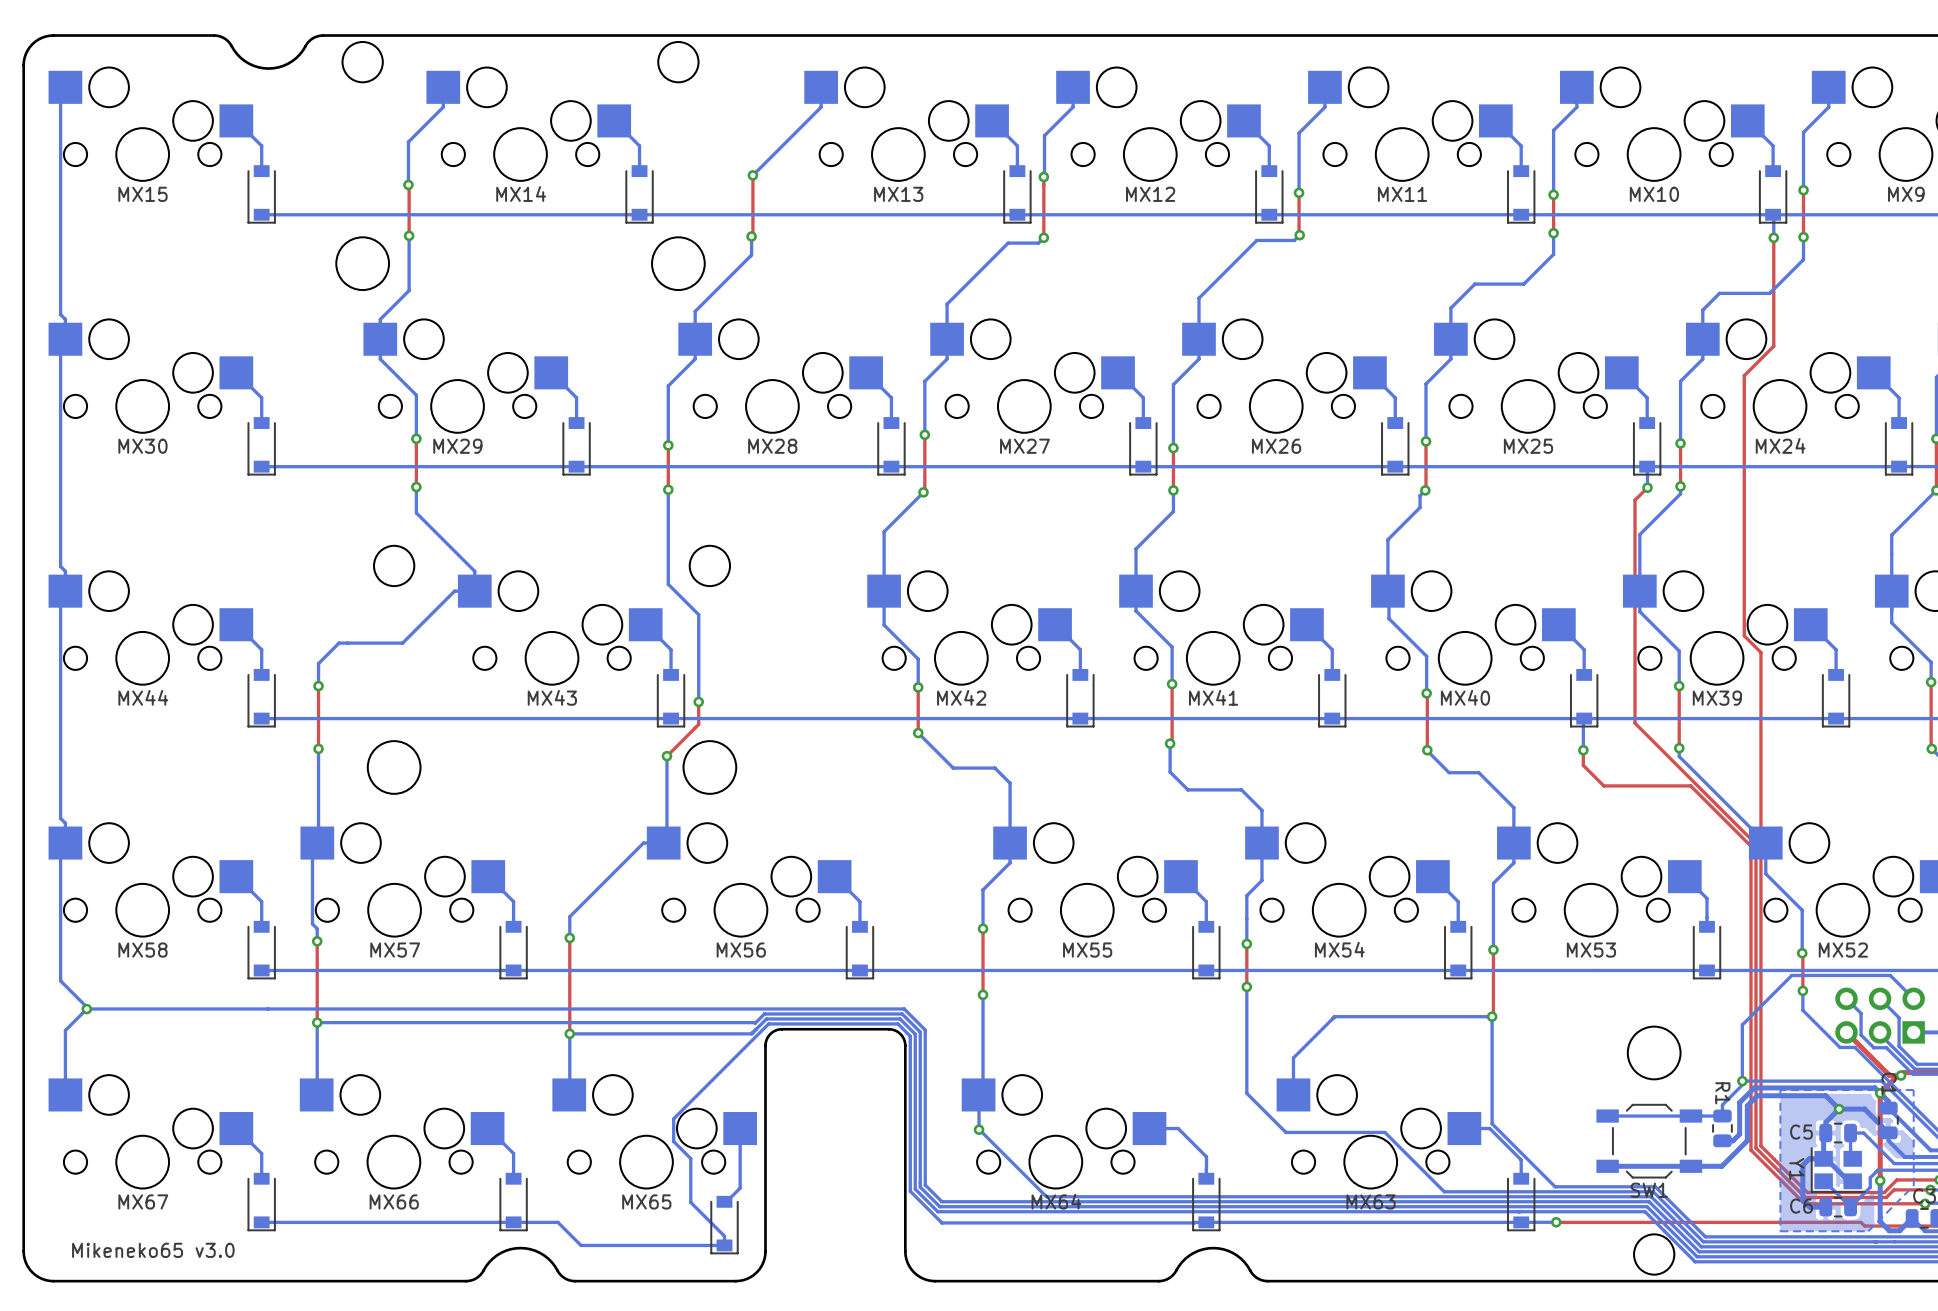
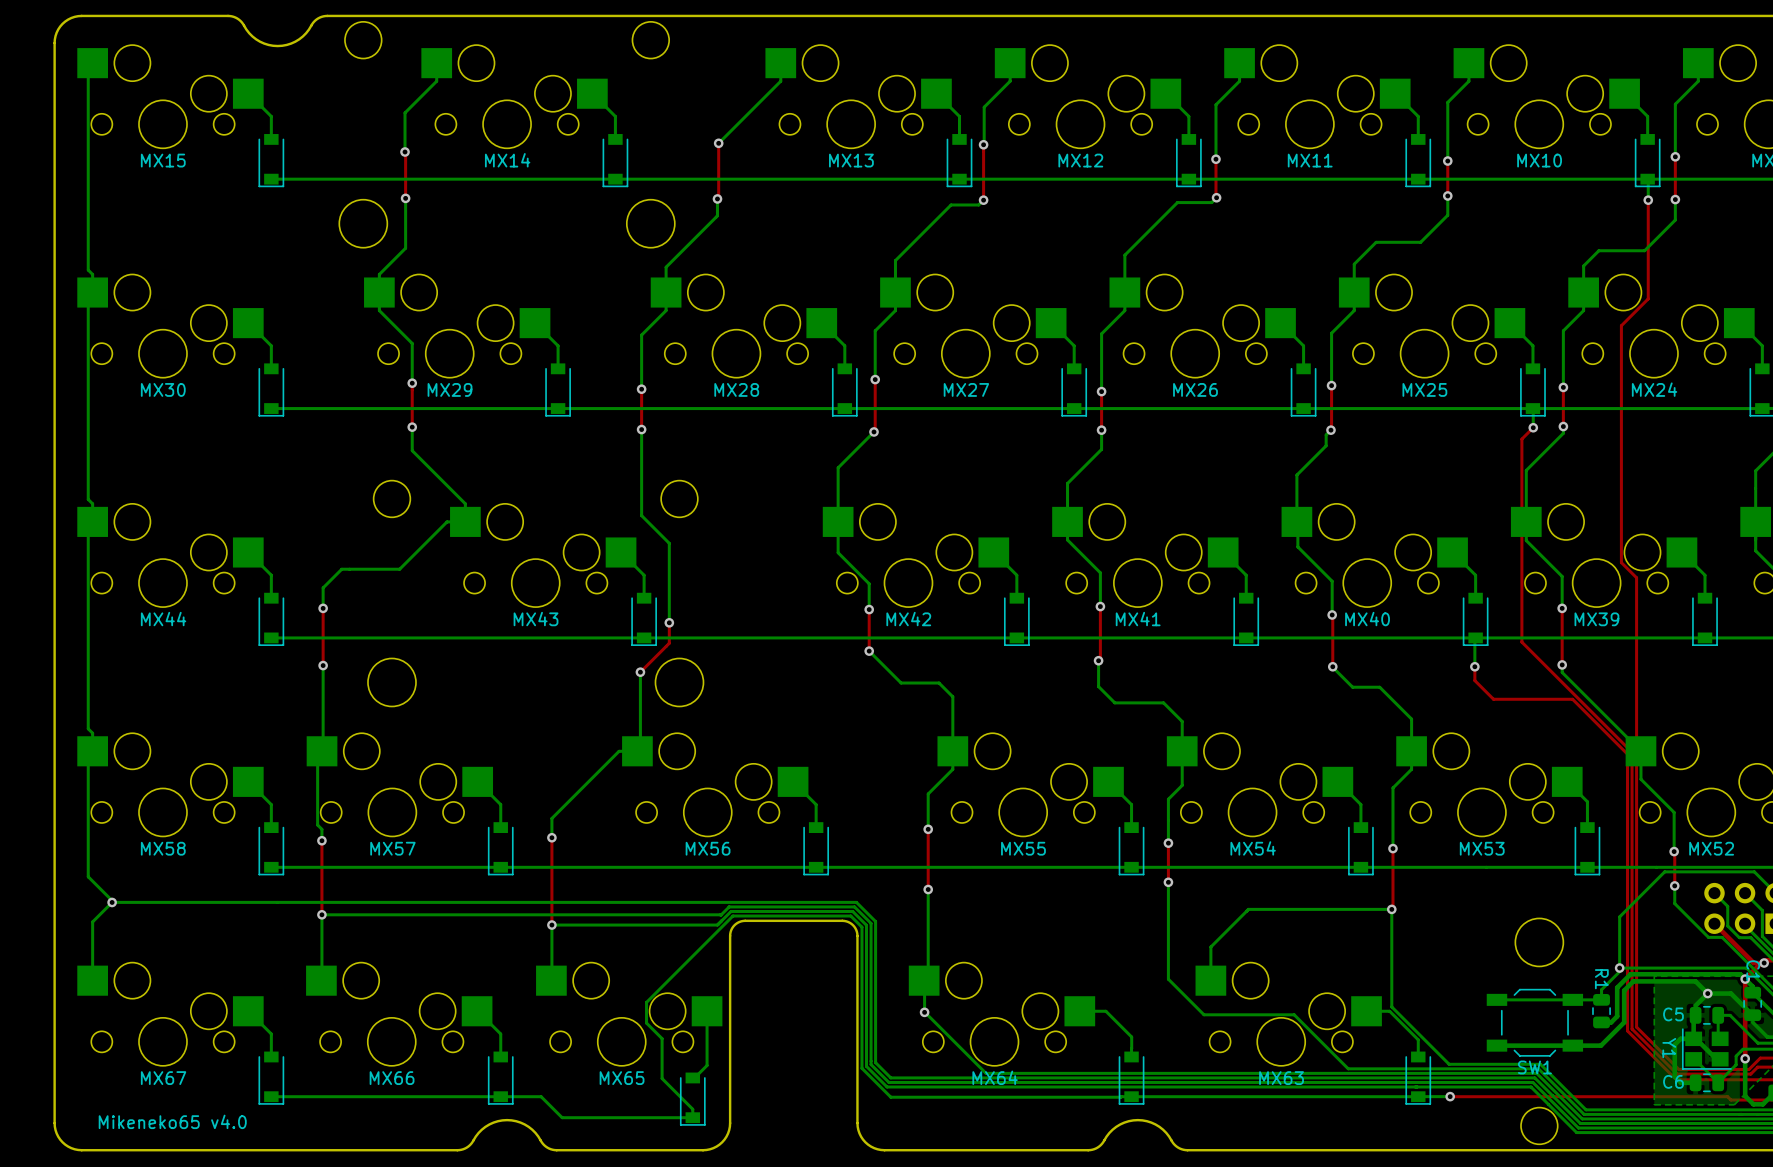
text: Mikeneko65 v3.0 (153, 1250) -> Mikeneko65 v4.0 (172, 1121)

